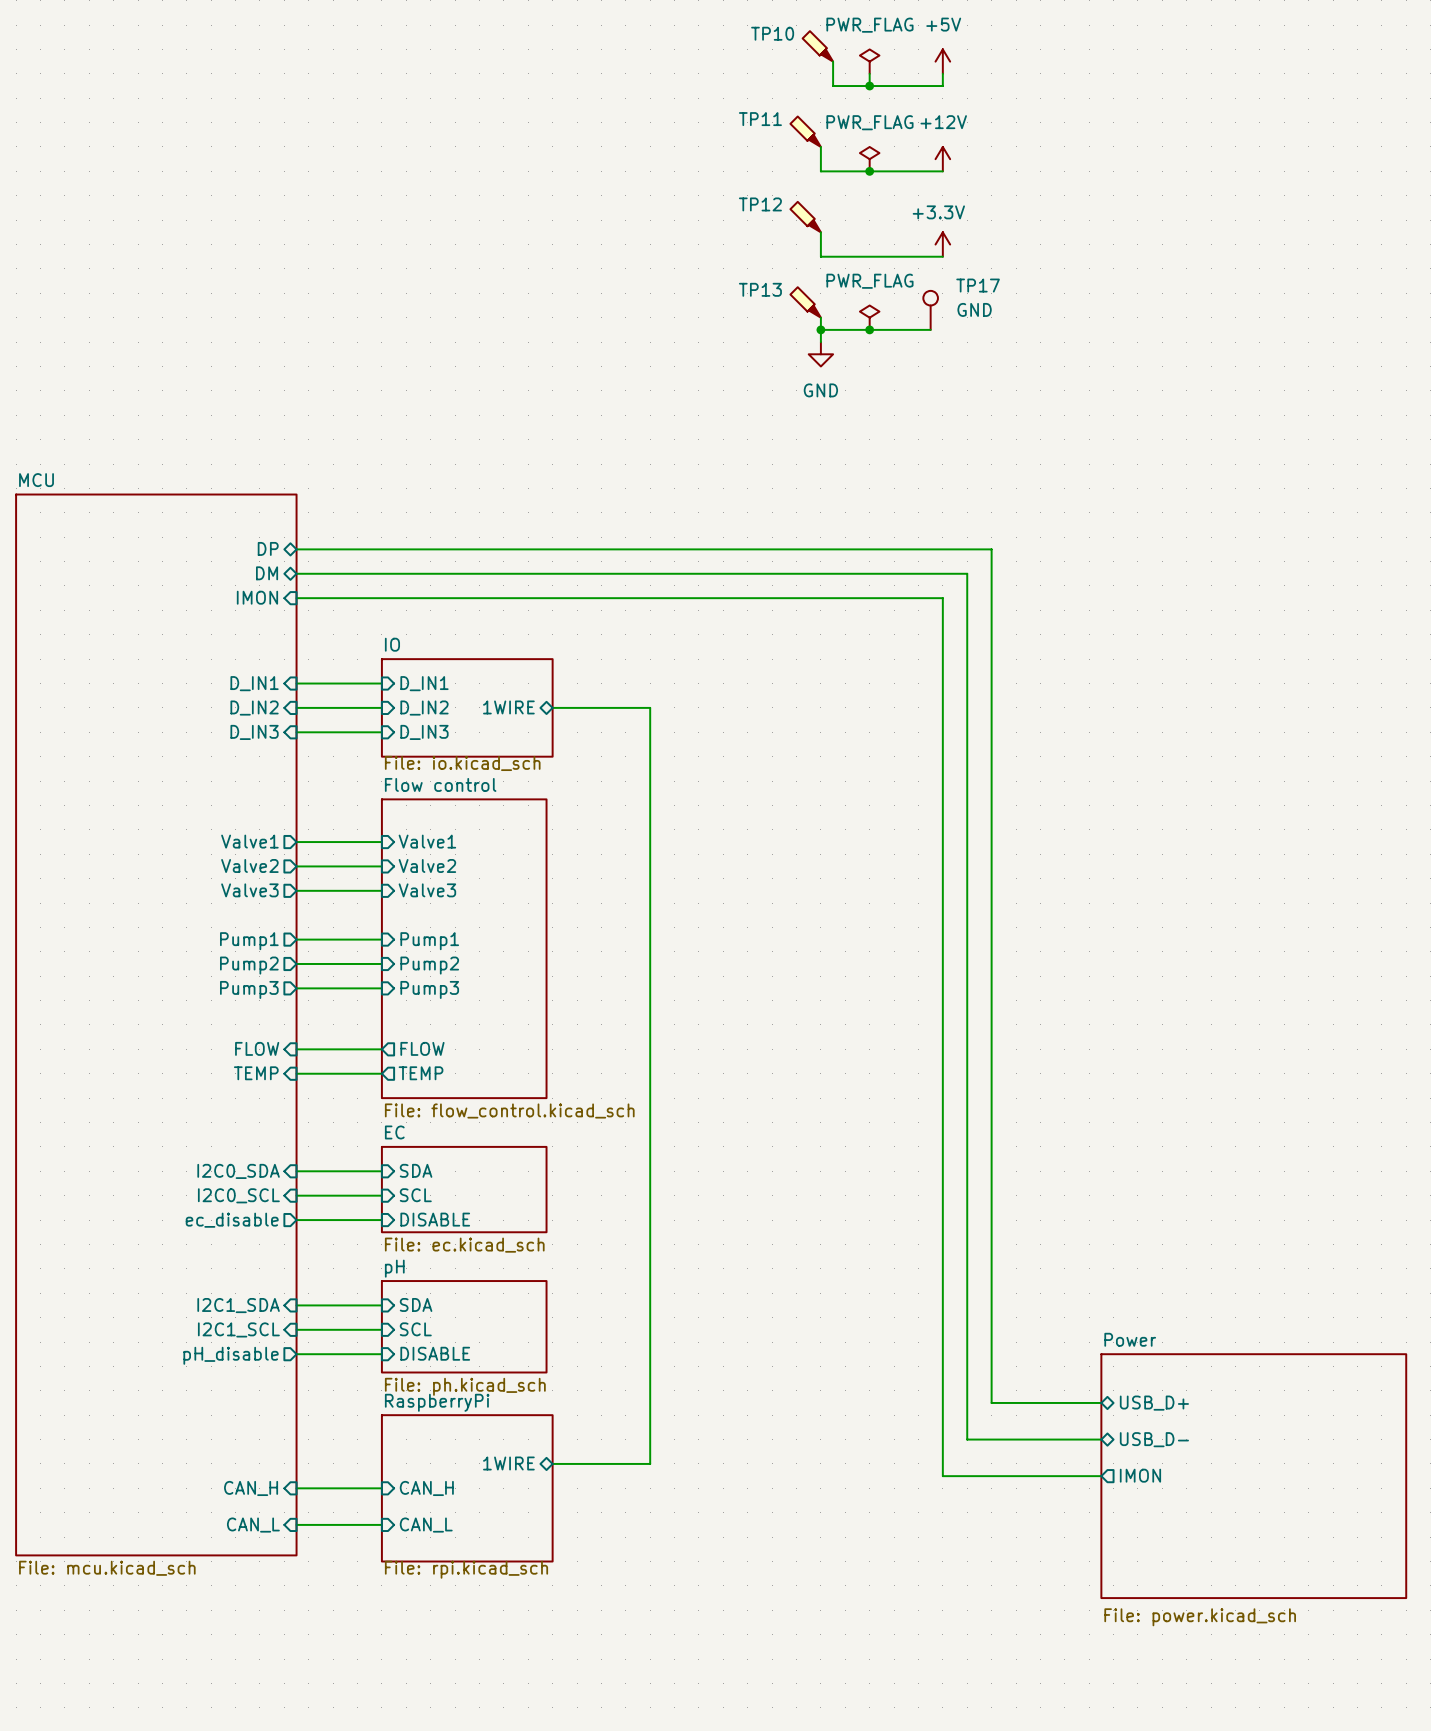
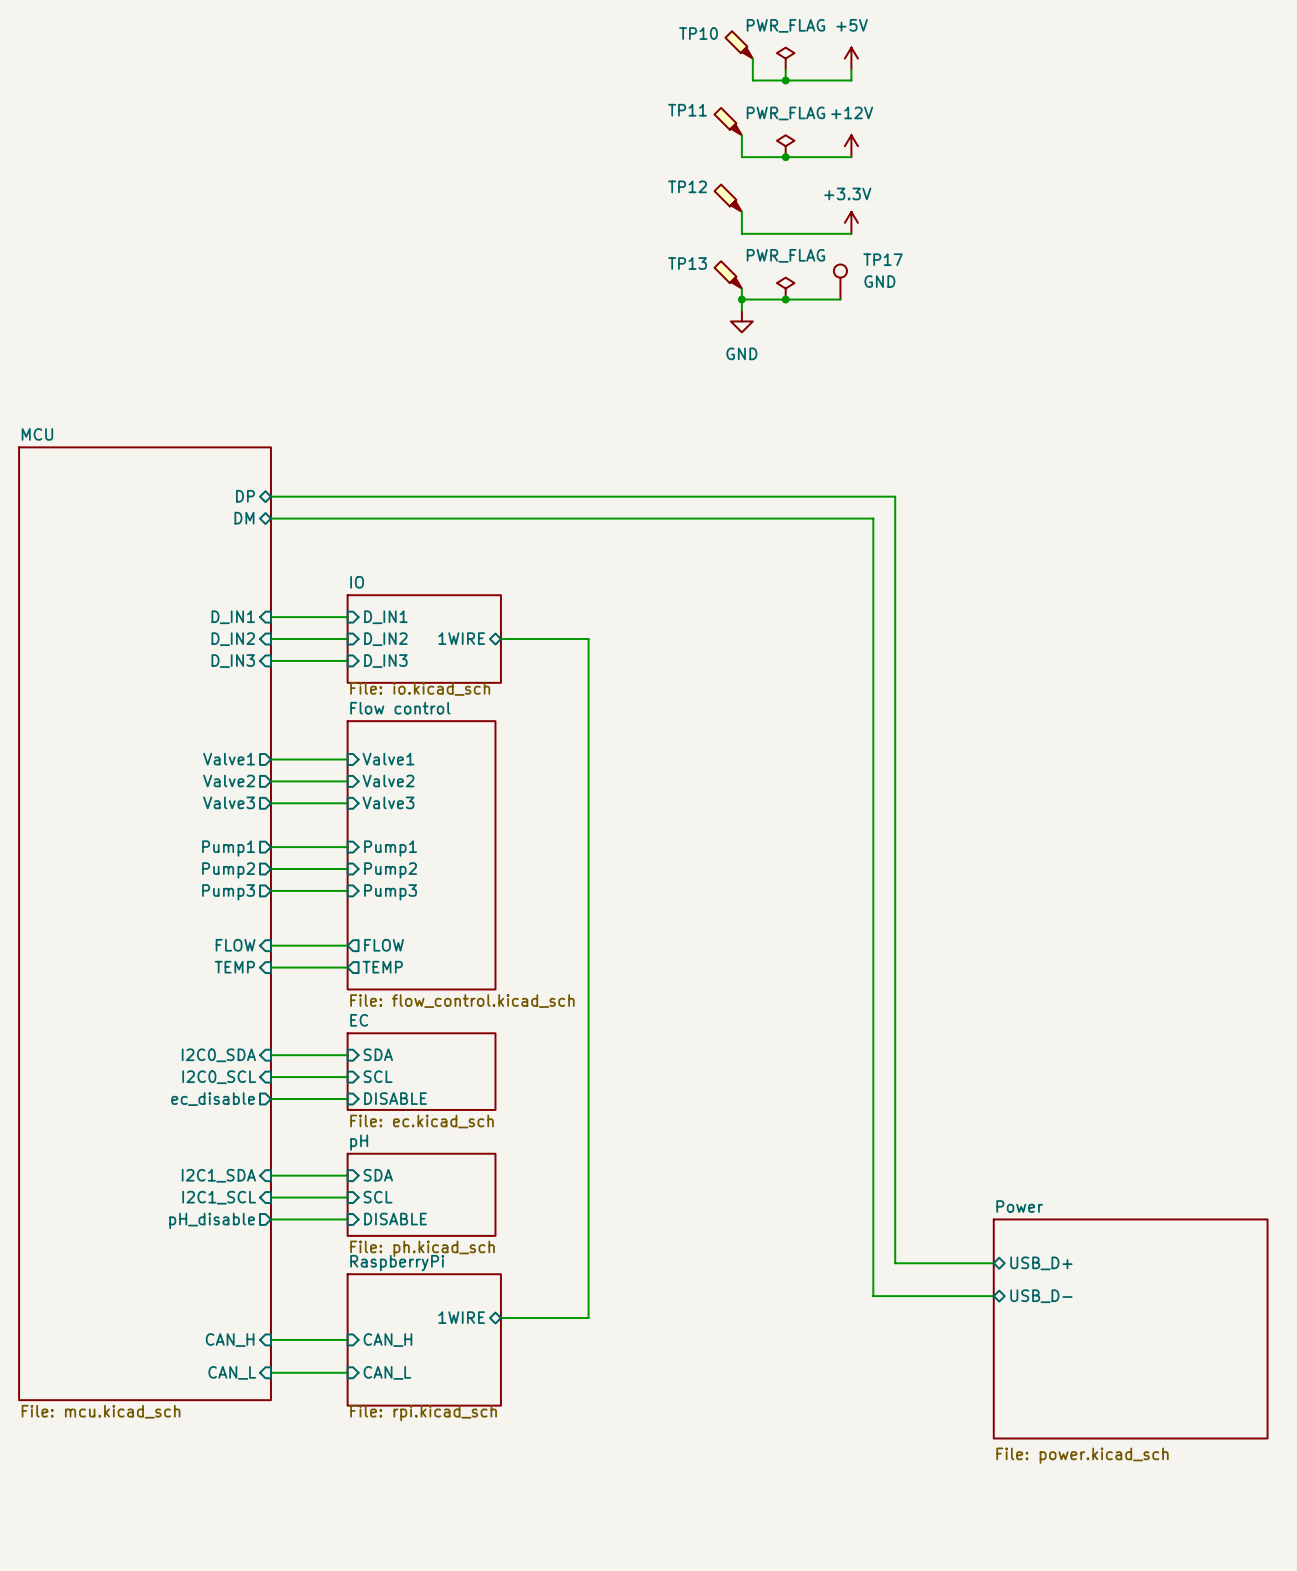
sheet pin: IMON (257, 597) -> none
wire: (296, 598) (942, 598) (942, 1476) (1101, 1476) -> none
sheet pin: IMON (1140, 1475) -> none

